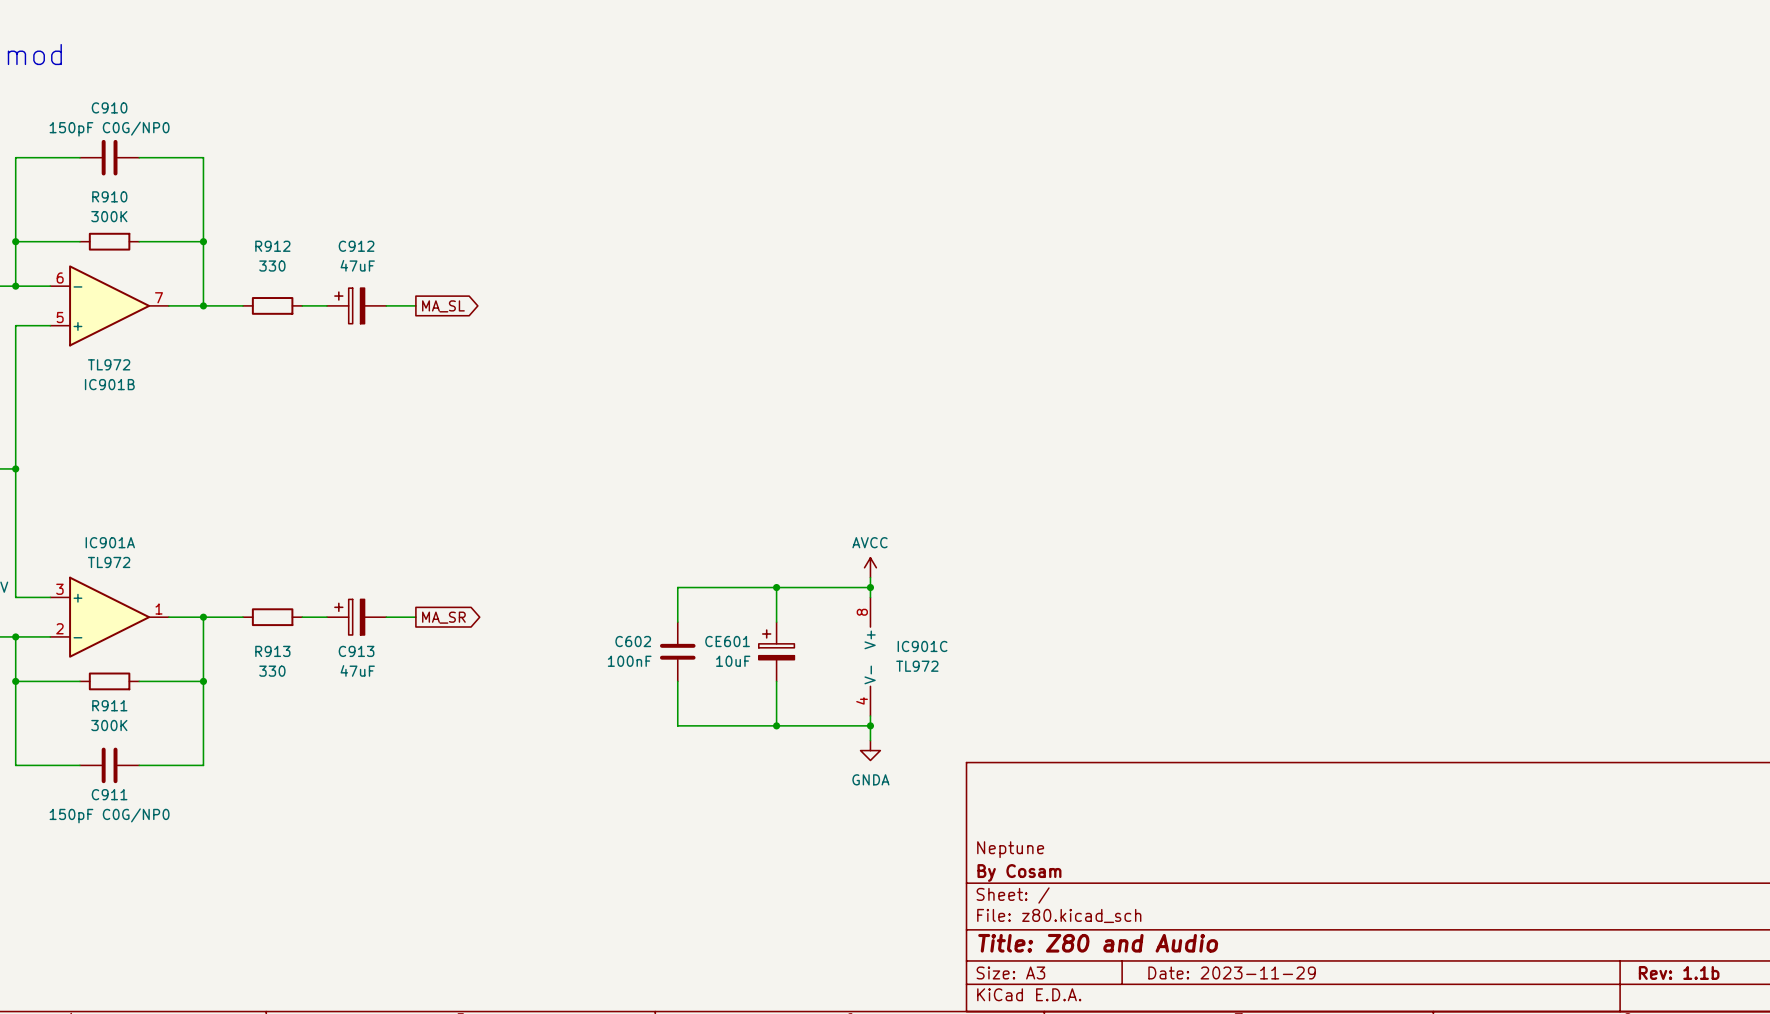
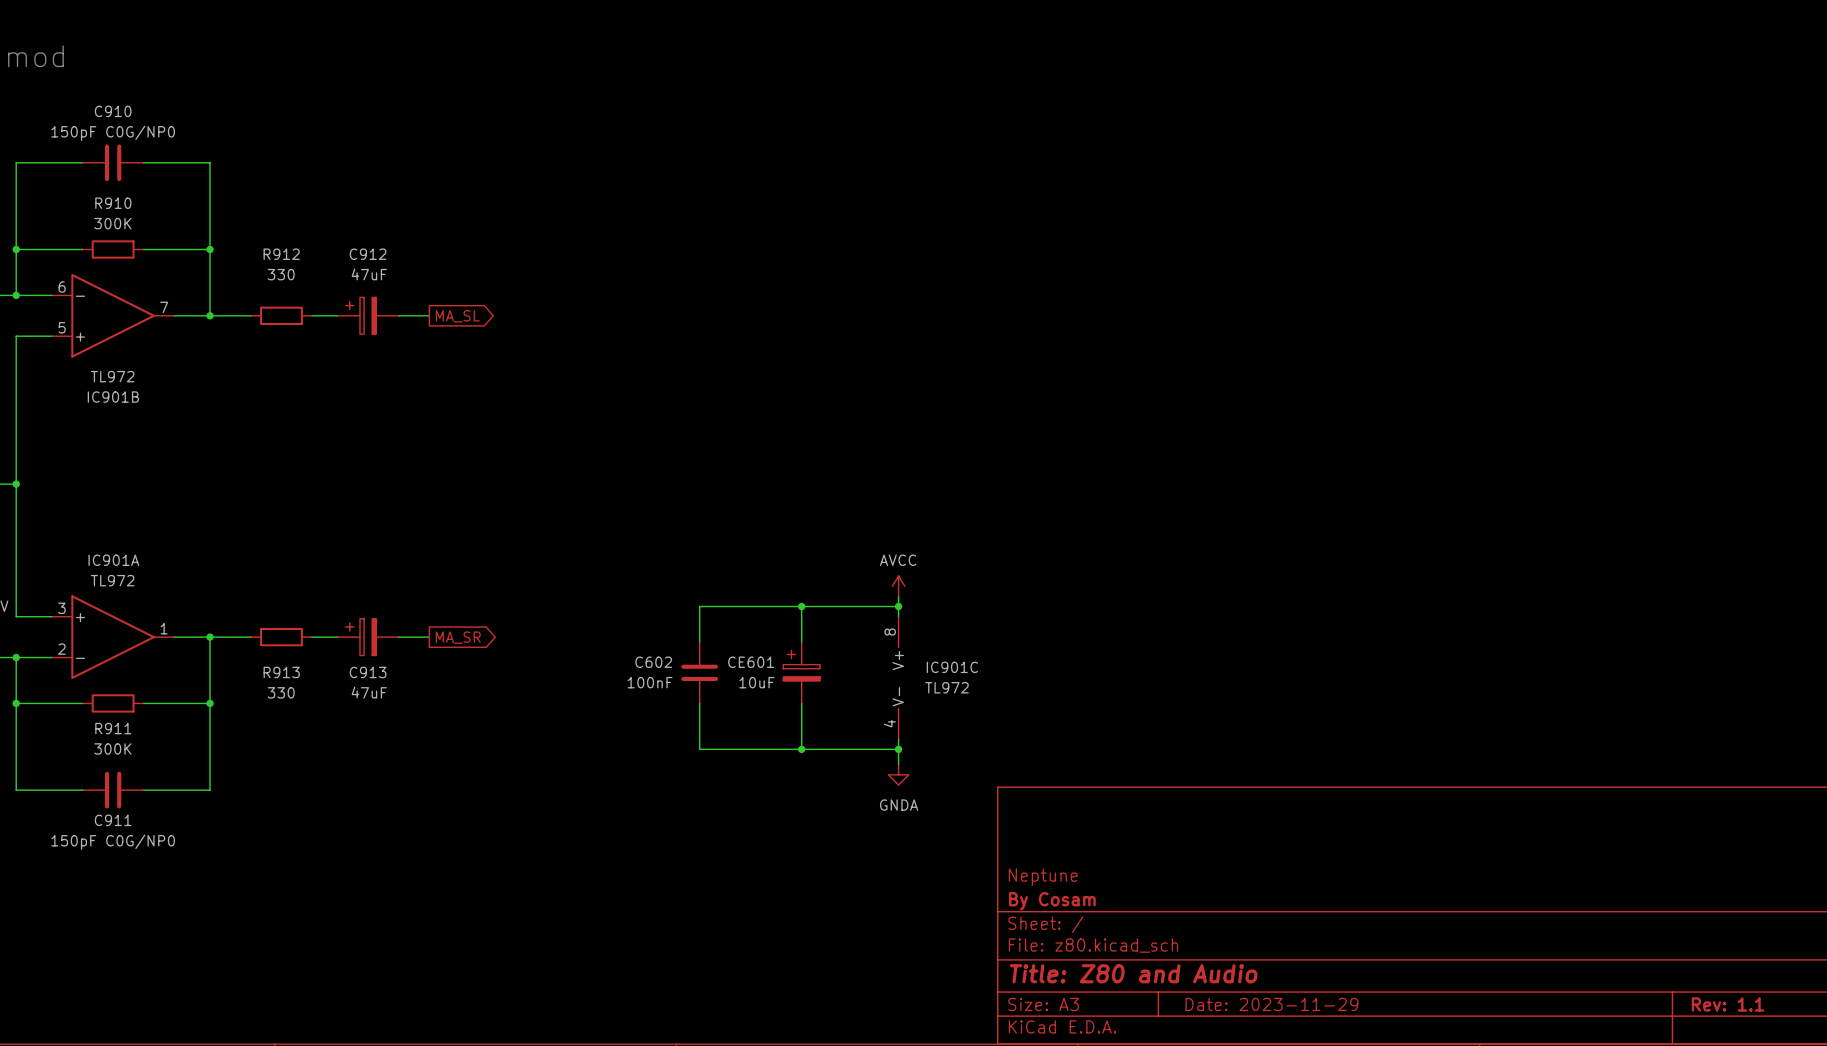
title block: Rev: 1.1b (1679, 972) -> Rev: 1.1 (1727, 1004)

